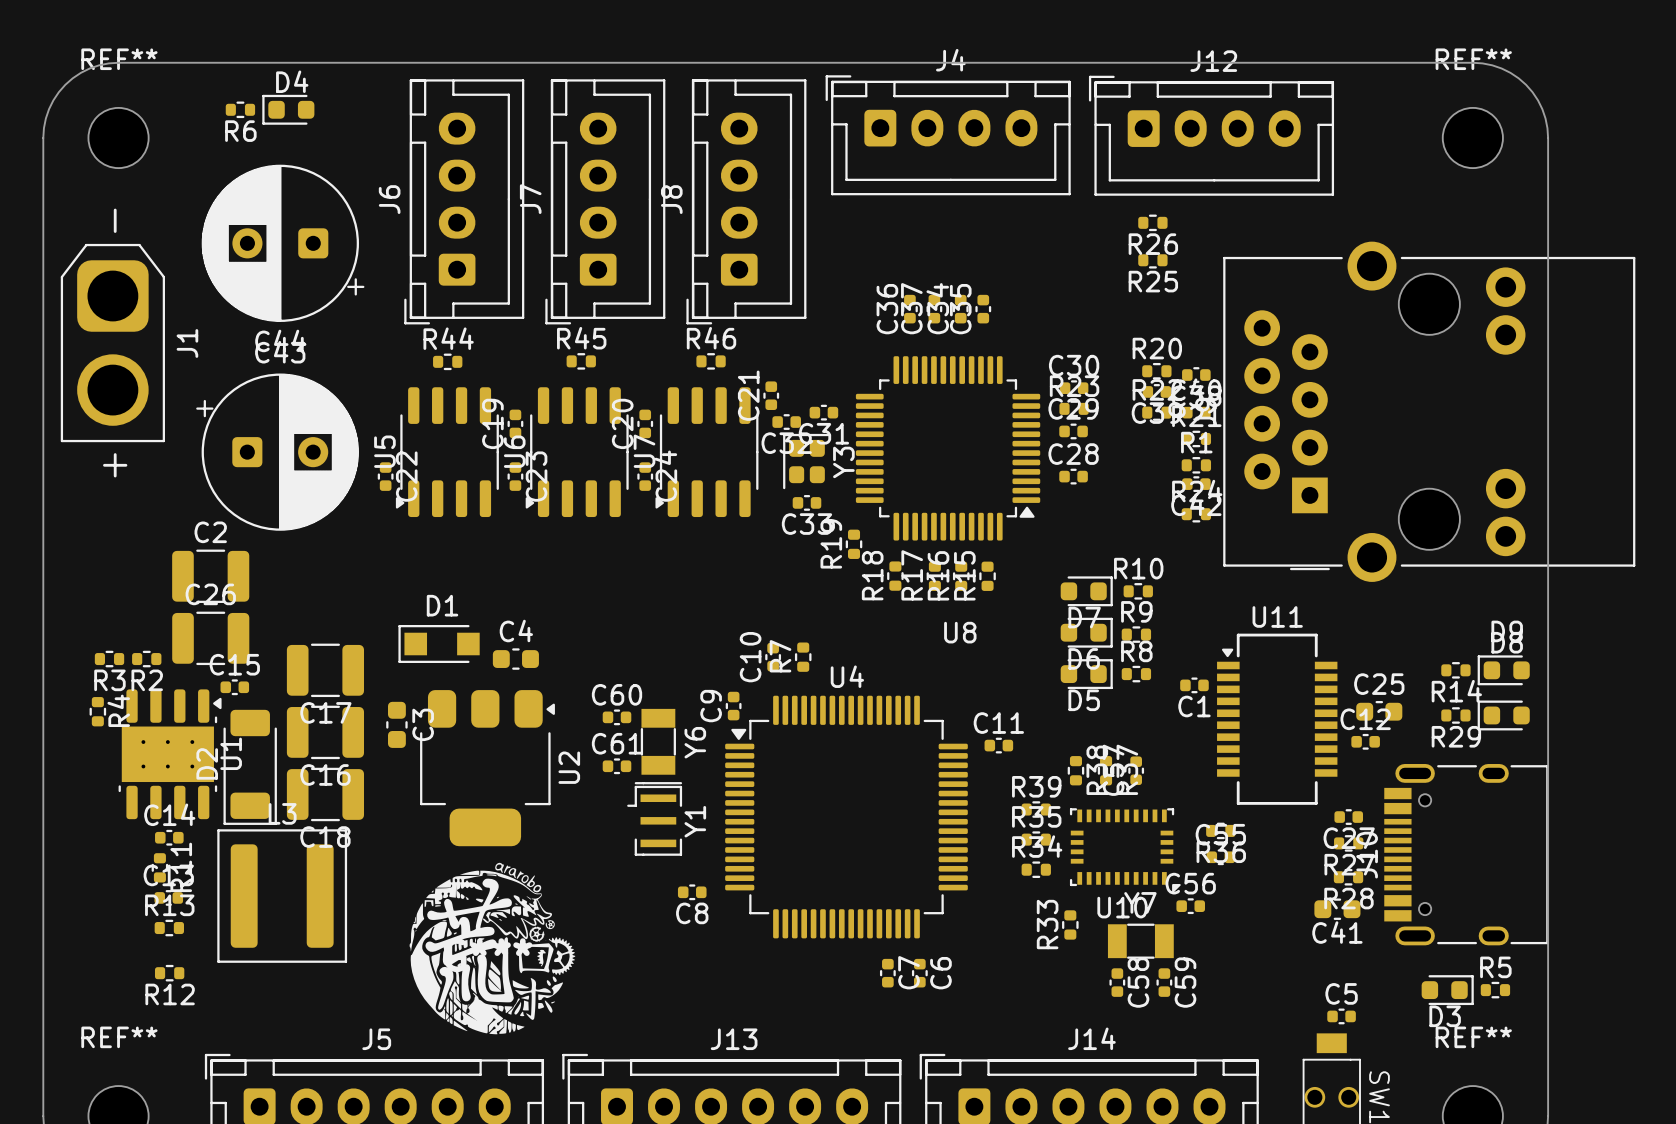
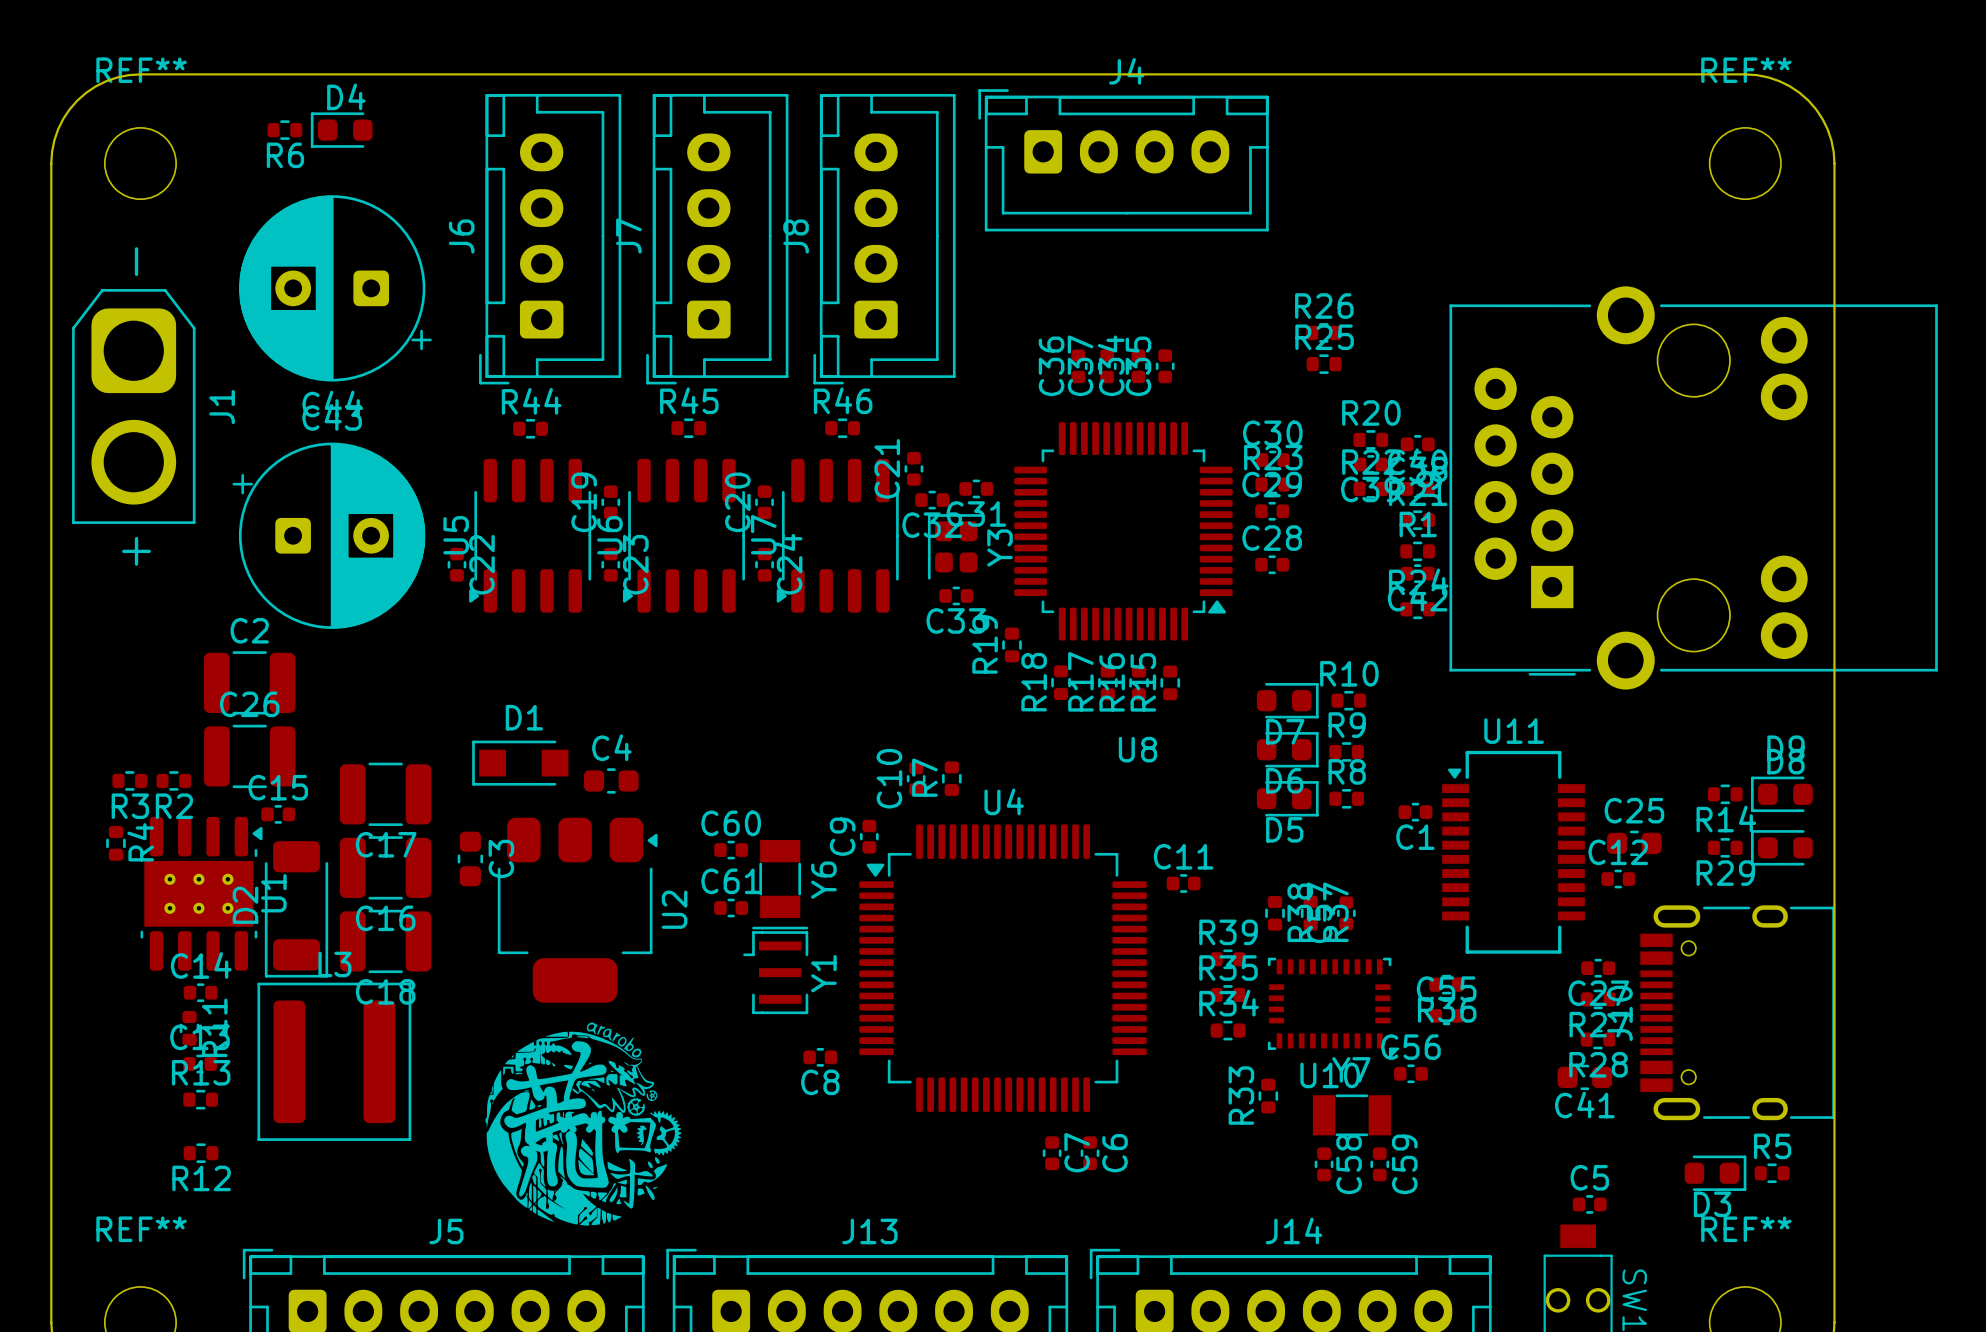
J12: (1211, 135) -> none
R26 position: (1152, 222) -> (1323, 332)
R26 name position: R26 (1153, 244) -> R26 (1324, 306)
R25 position: (1152, 260) -> (1324, 364)
R25 name position: R25 (1153, 281) -> R25 (1324, 337)

